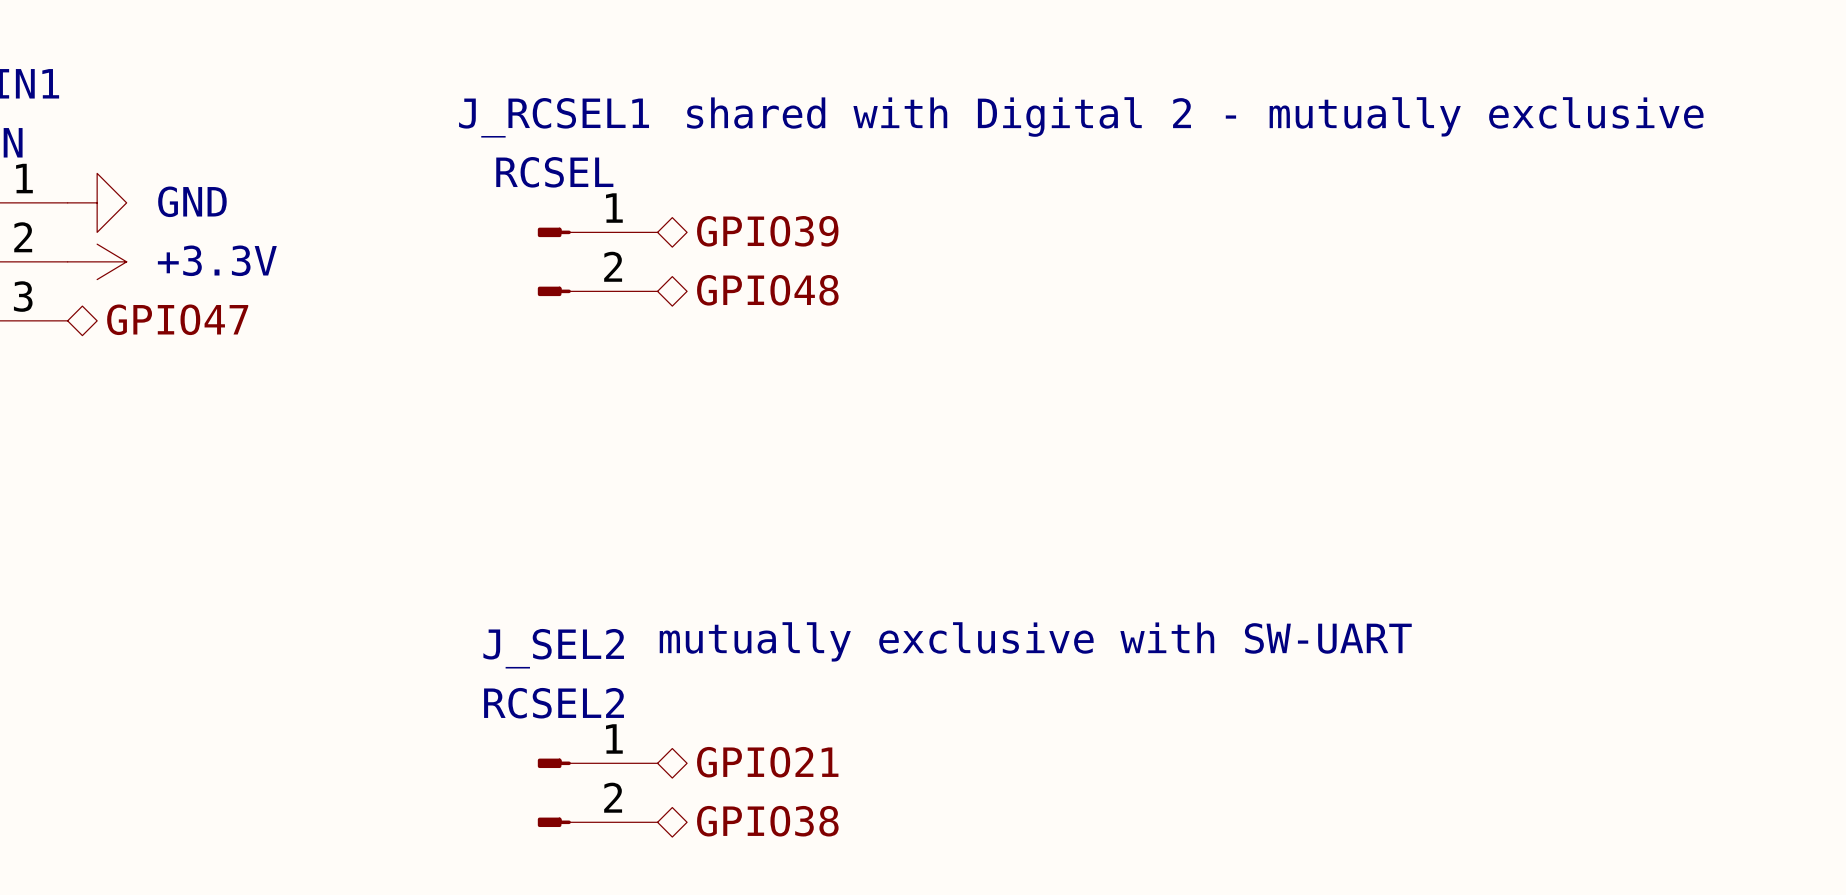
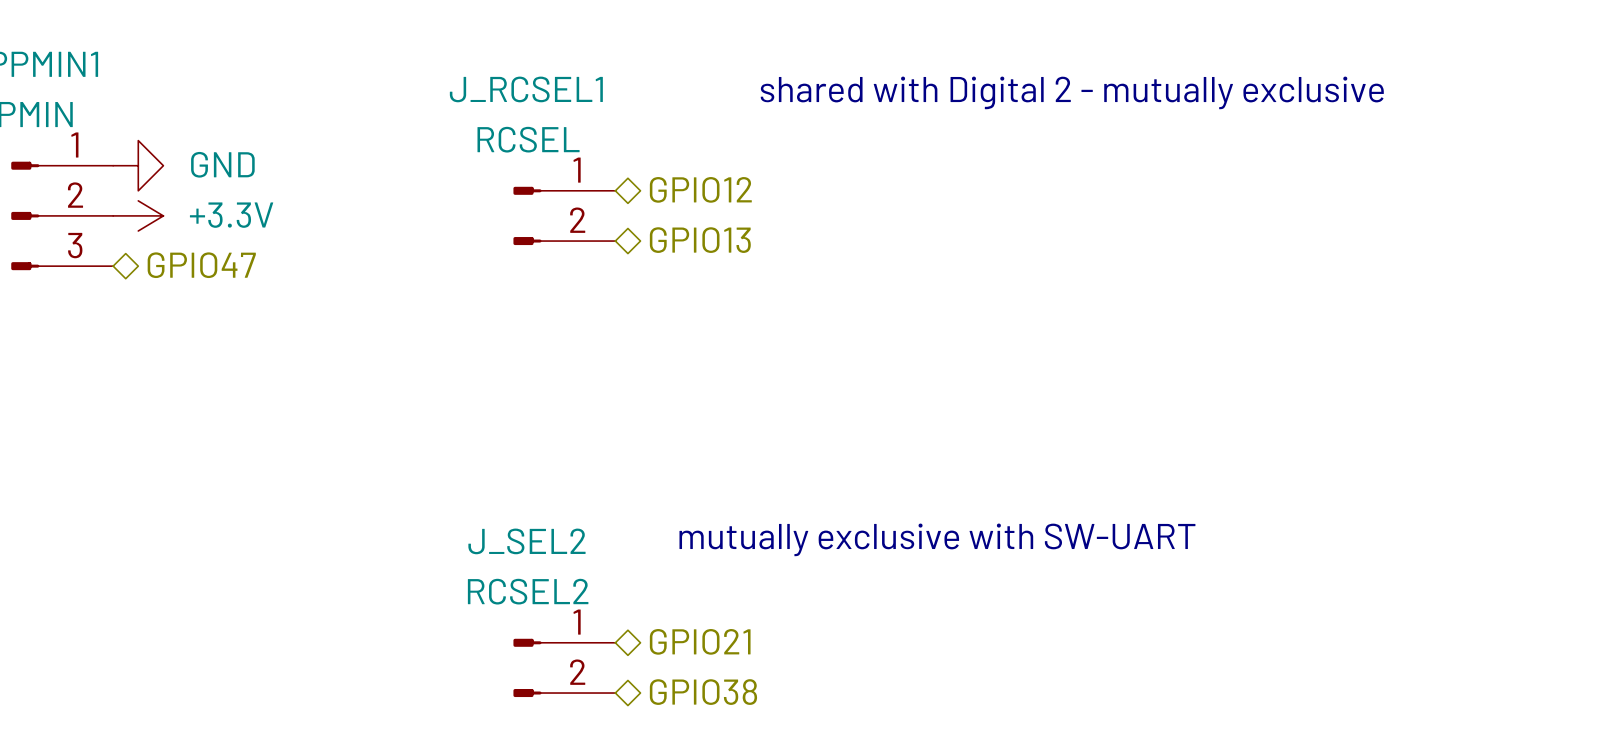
hierarchical label: GPIO39 (767, 231) -> GPIO12 (700, 189)
hierarchical label: GPIO48 (767, 290) -> GPIO13 (700, 240)

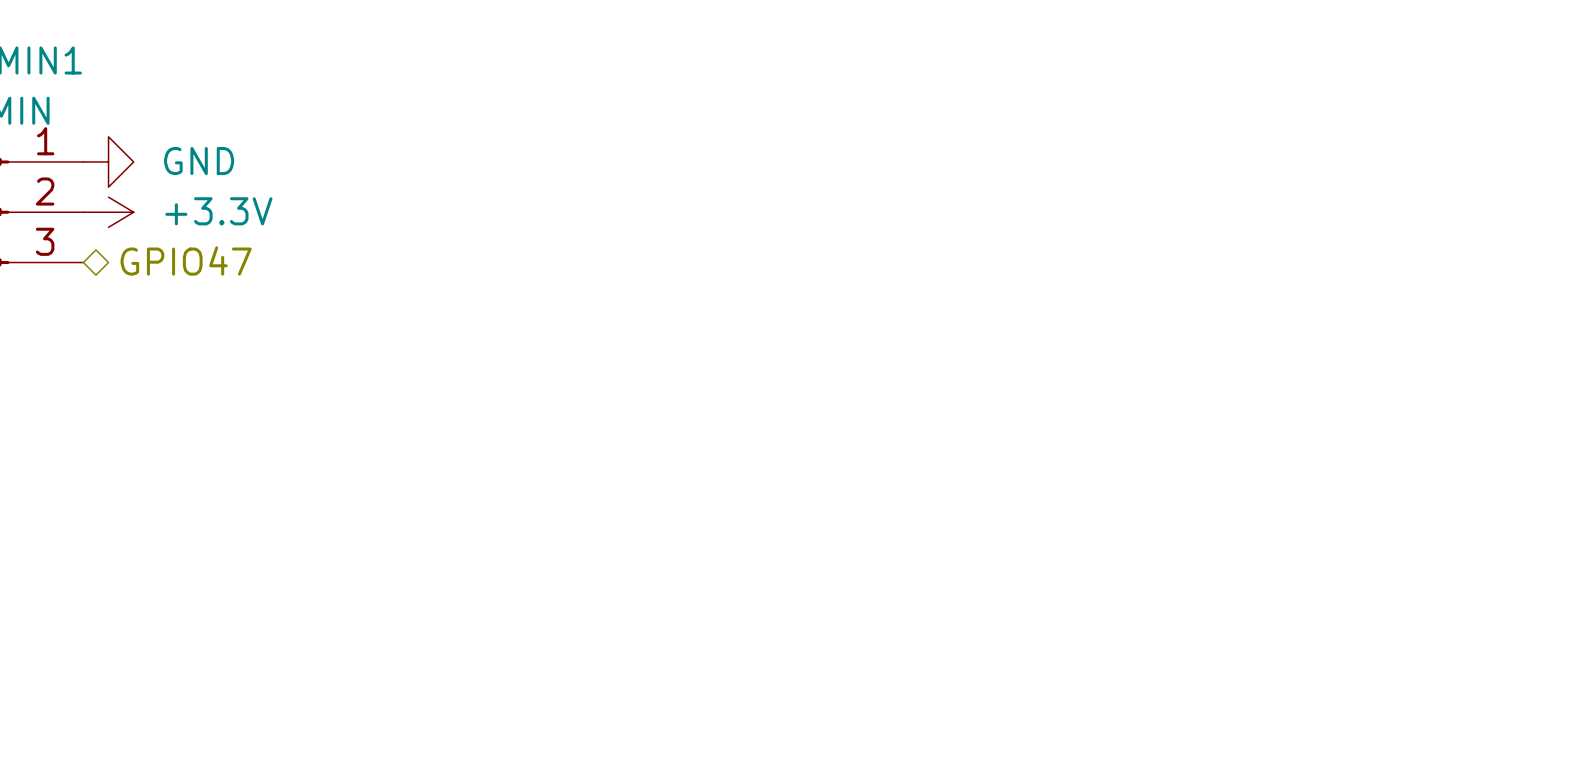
text: shared with Digital 2 - mutually exclusive (1072, 92) -> none
hierarchical label: GPIO12 (700, 189) -> none
J_RCSEL1: RCSEL (564, 215) -> none
hierarchical label: GPIO13 (700, 240) -> none
text: mutually exclusive with SW-UART (937, 539) -> none
hierarchical label: GPIO21 (700, 641) -> none
J_SEL2: RCSEL2 (564, 667) -> none
hierarchical label: GPIO38 (703, 692) -> none

